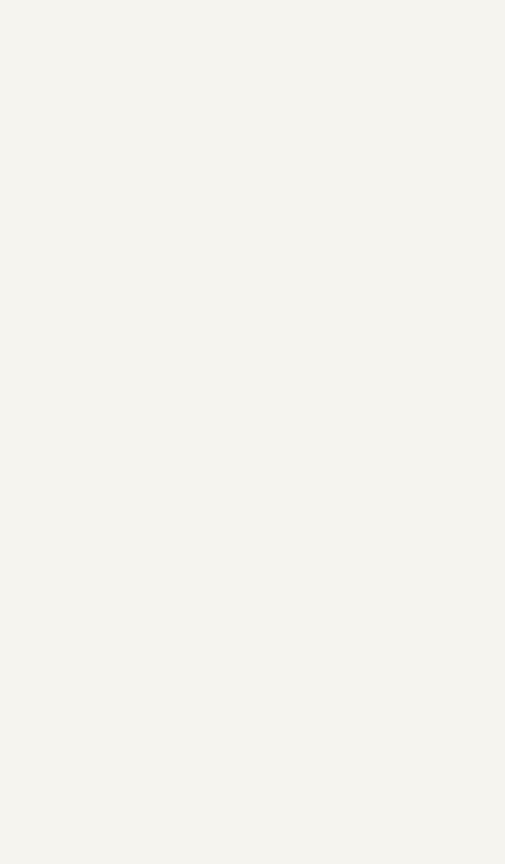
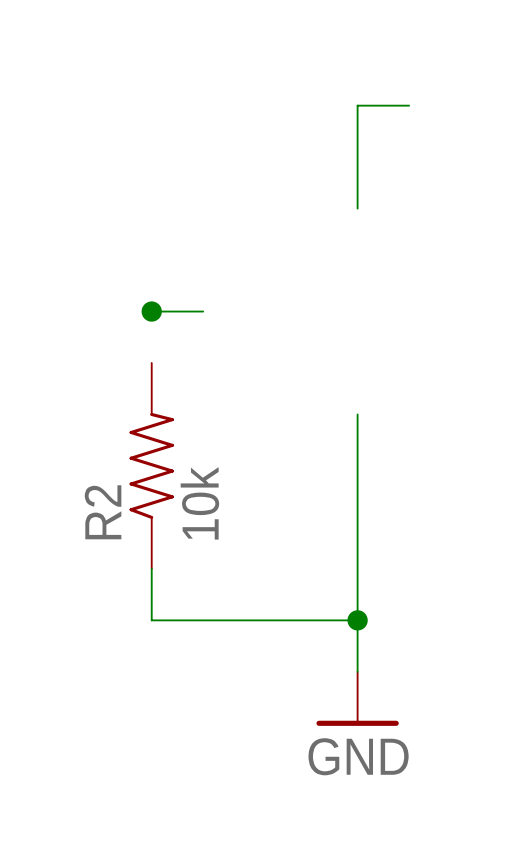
wire: none -> (409, 105) (357, 105) (357, 208)
wire: none -> (151, 311) (203, 311)
junction: none -> (151, 311)
wire: none -> (357, 414) (357, 671)
R2: none -> 10k (151, 465)
wire: none -> (151, 568) (151, 620) (357, 620)
junction: none -> (357, 620)
power symbol: none -> GND (357, 698)

